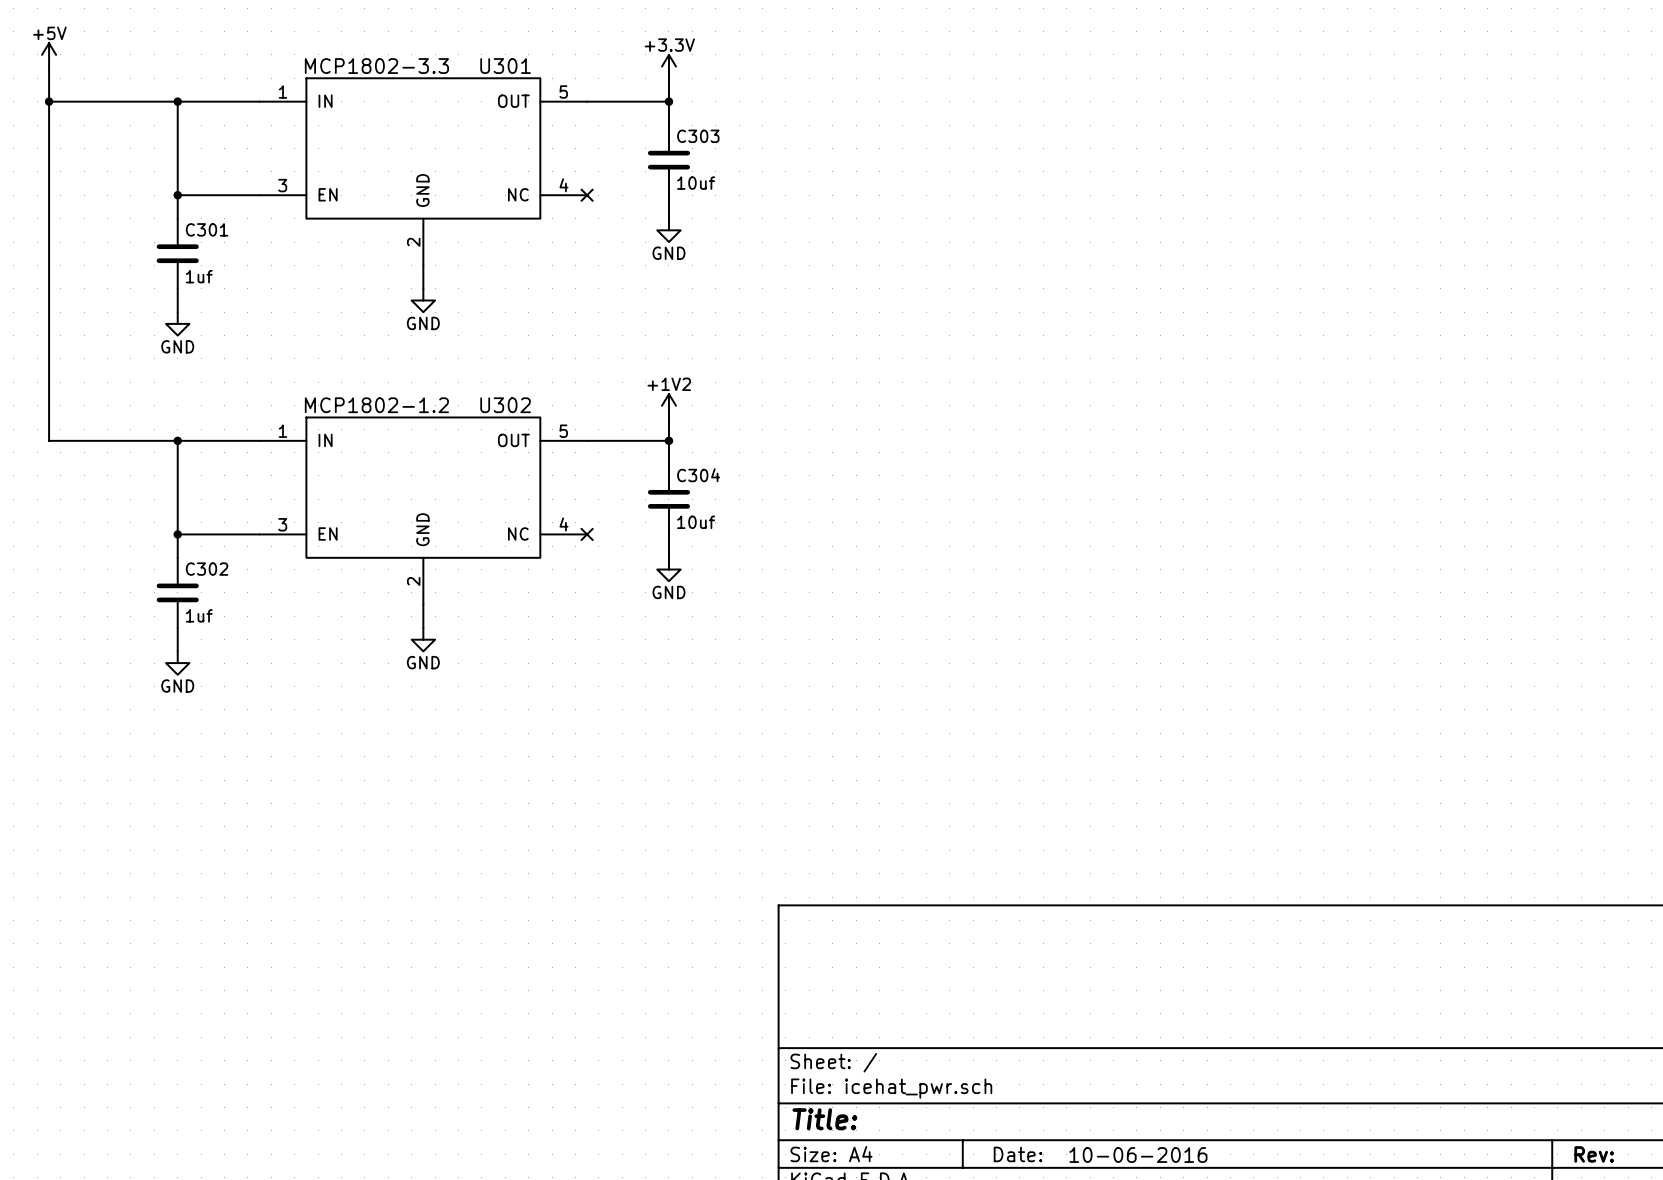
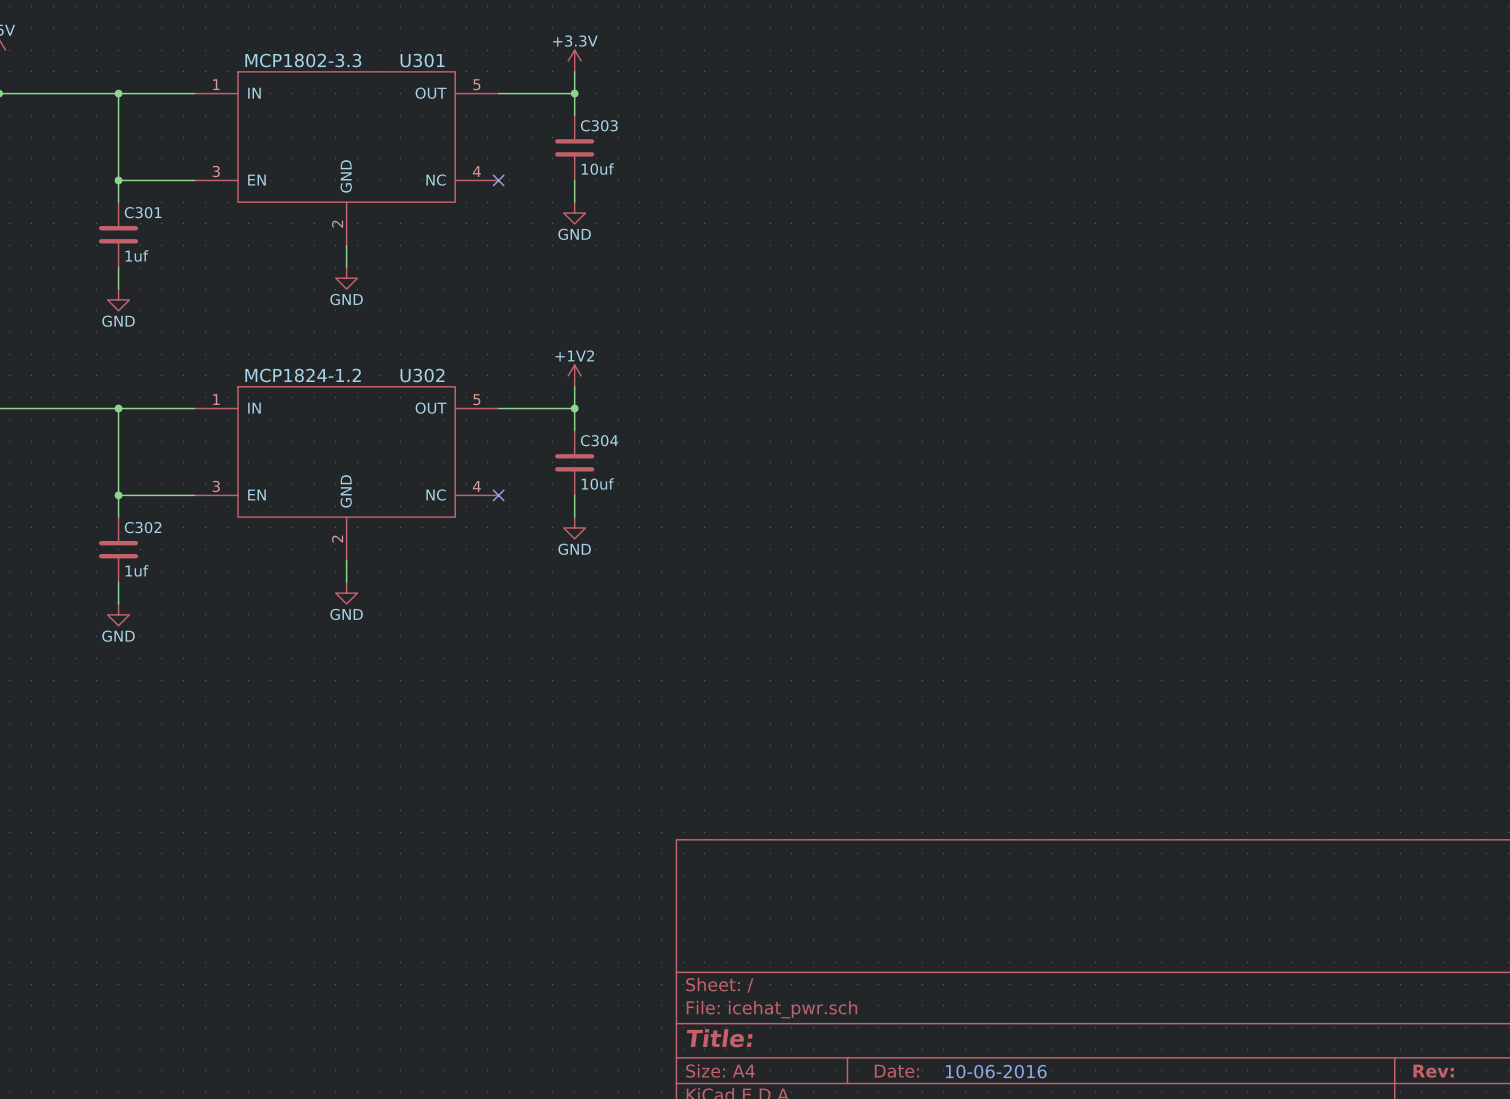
U302 value: MCP1802-1.2 (376, 405) -> MCP1824-1.2 (303, 375)

